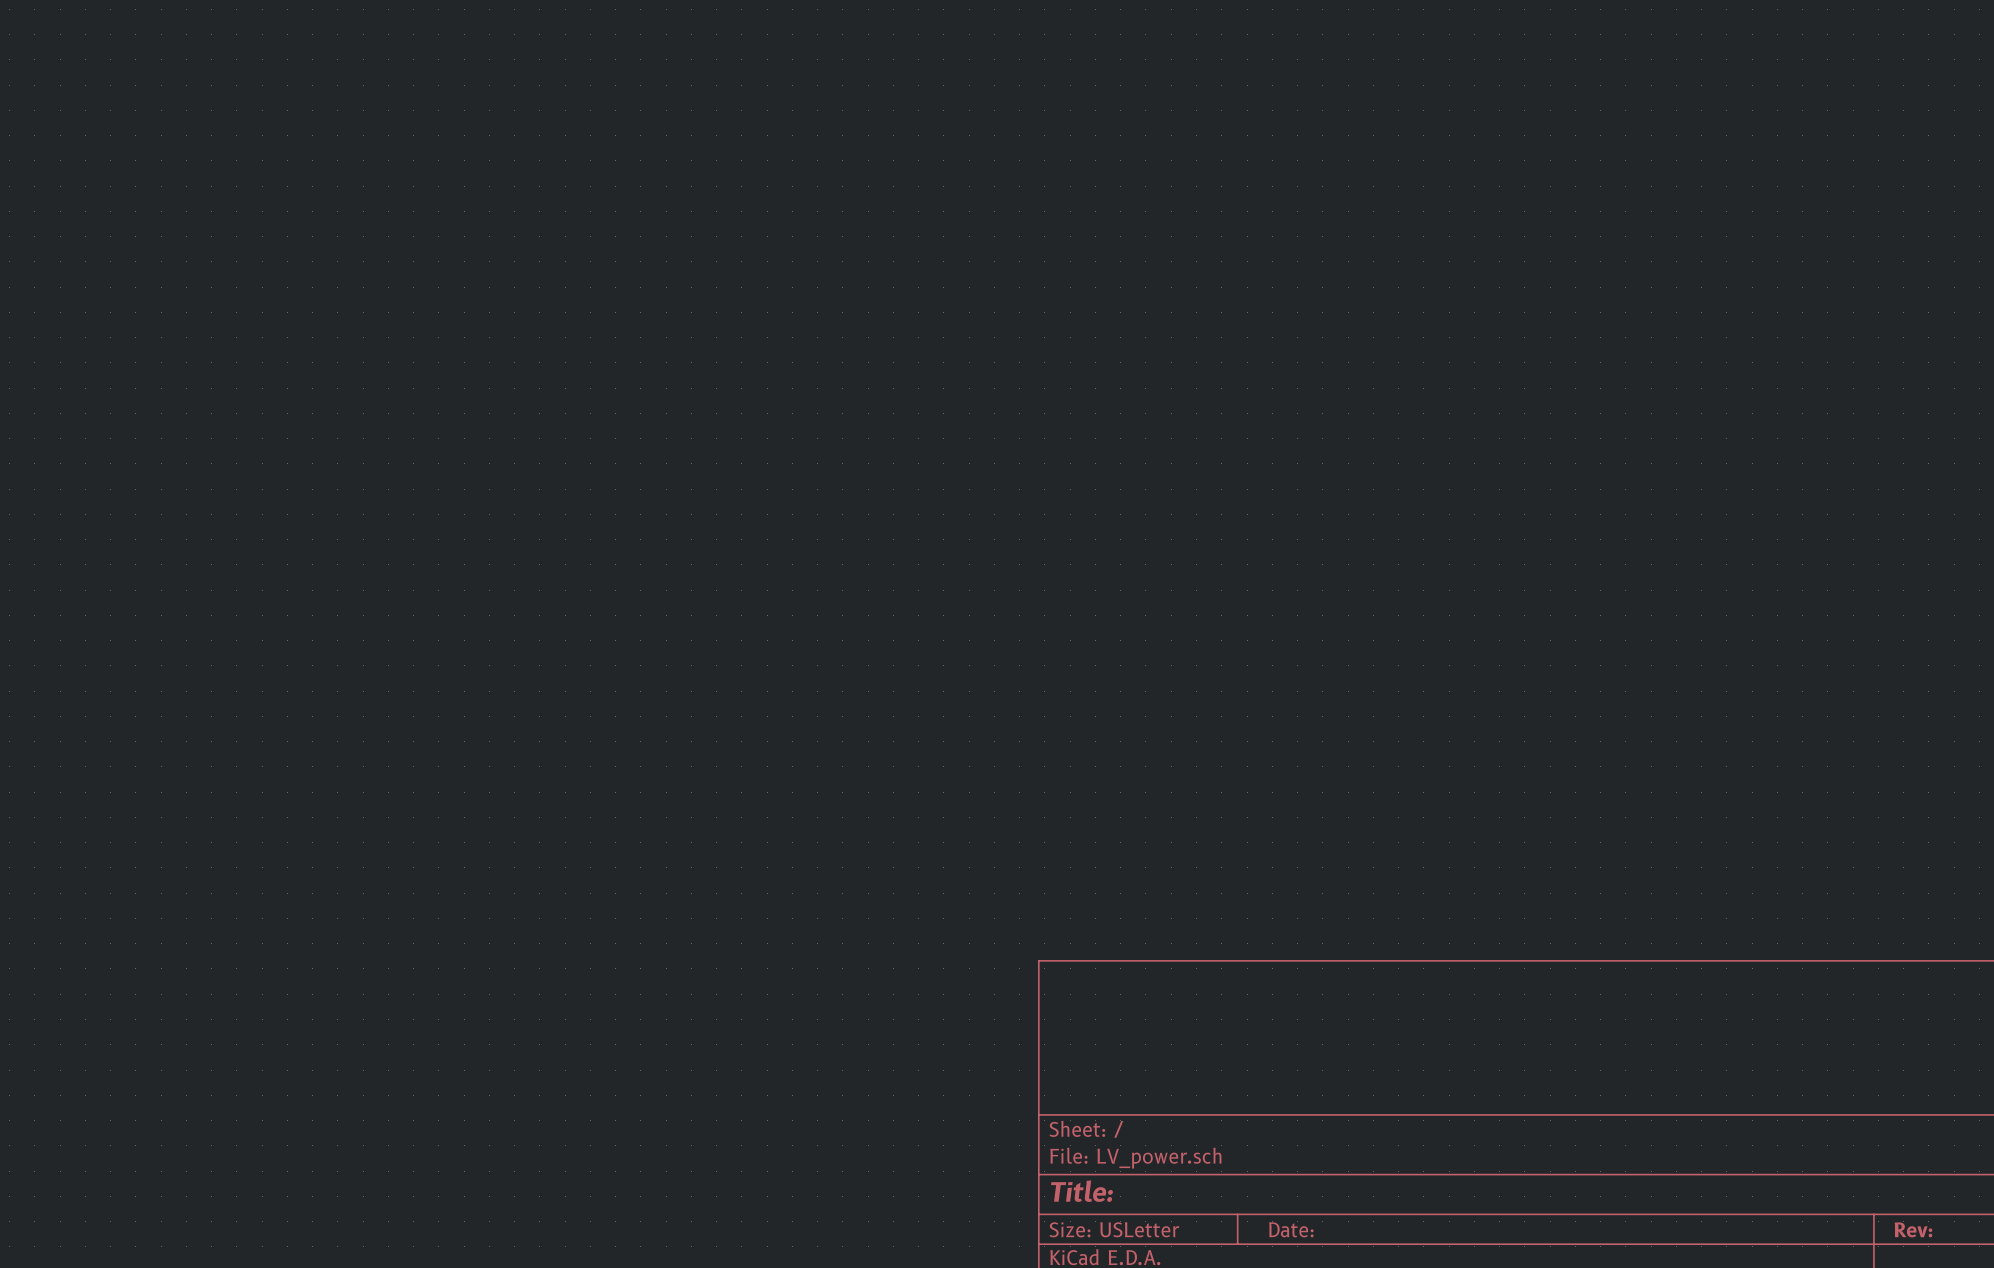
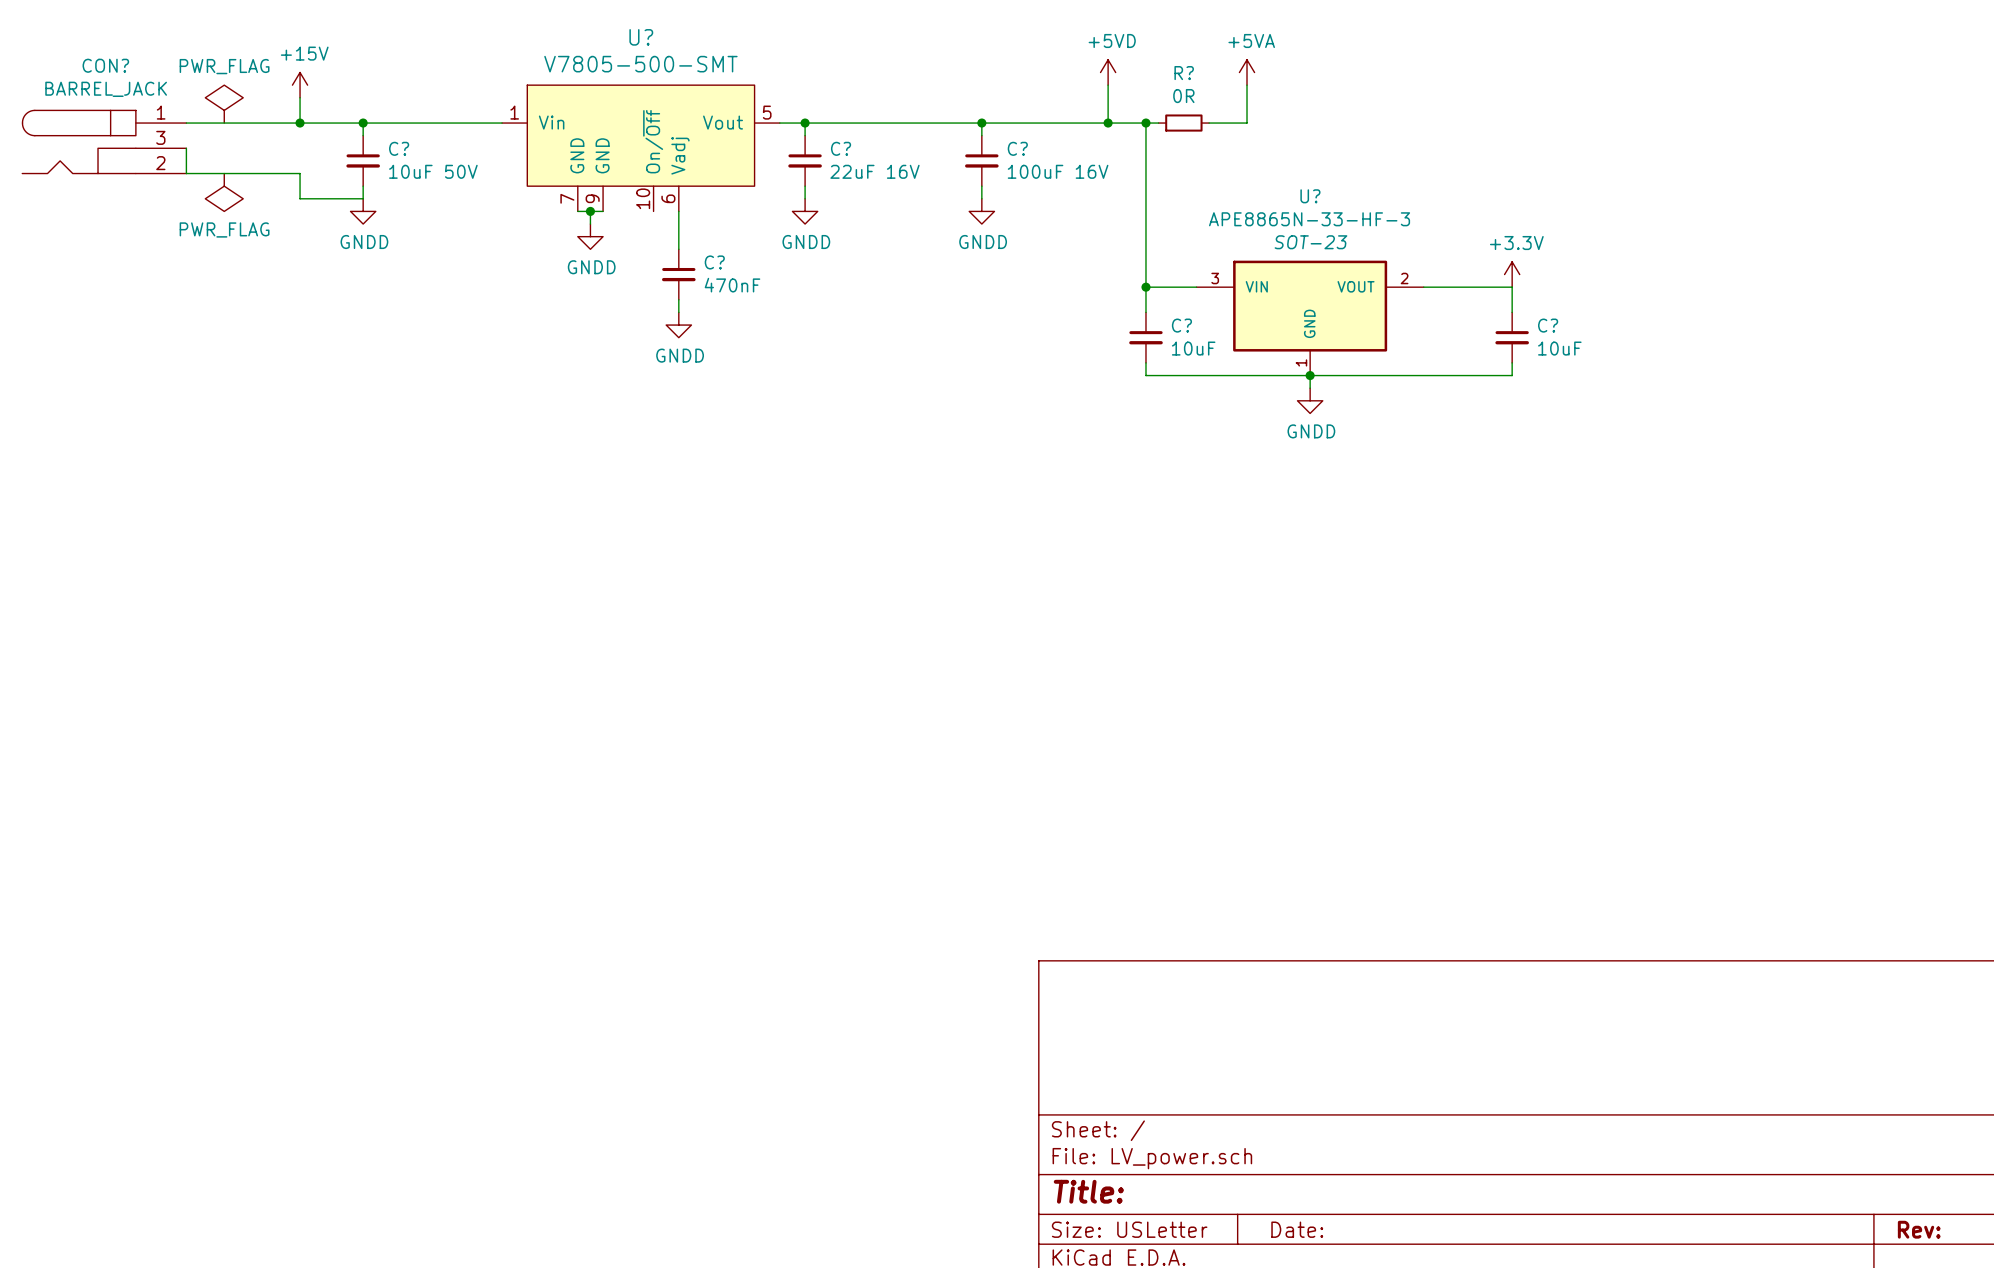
power symbol: none -> +5VD (1108, 72)
power symbol: none -> +5VA (1247, 72)
power symbol: none -> +15V (300, 85)
wire: none -> (1108, 85) (1108, 123)
wire: none -> (1247, 85) (1247, 123) (1209, 123)
wire: none -> (300, 97) (300, 123)
power symbol: none -> PWR_FLAG (224, 104)
wire: none -> (186, 123) (502, 123)
junction: none -> (300, 123)
wire: none -> (363, 123) (363, 135)
junction: none -> (363, 123)
wire: none -> (779, 123) (1158, 123)
wire: none -> (805, 123) (805, 135)
junction: none -> (805, 123)
wire: none -> (981, 123) (981, 135)
junction: none -> (981, 123)
junction: none -> (1108, 123)
wire: none -> (1145, 123) (1145, 312)
junction: none -> (1145, 123)
R?: none -> 0R (1183, 123)
CON?: none -> BARREL_JACK (104, 141)
wire: none -> (186, 148) (186, 173) (300, 173) (300, 198) (363, 198) (363, 186)
U?: none -> V7805-500-SMT (640, 148)
C?: none -> 10uF 50V (363, 160)
C?: none -> 22uF 16V (805, 160)
C?: none -> 100uF 16V (981, 160)
wire: none -> (805, 186) (805, 198)
wire: none -> (981, 186) (981, 198)
power symbol: none -> PWR_FLAG (224, 192)
power symbol: none -> GNDD (363, 211)
wire: none -> (577, 211) (603, 211)
wire: none -> (590, 211) (590, 224)
junction: none -> (590, 211)
wire: none -> (678, 211) (678, 249)
power symbol: none -> GNDD (805, 211)
power symbol: none -> GNDD (981, 211)
power symbol: none -> GNDD (590, 236)
C?: none -> 470nF (678, 274)
power symbol: none -> +3.3V (1512, 274)
wire: none -> (1145, 287) (1196, 287)
junction: none -> (1145, 287)
wire: none -> (1423, 287) (1512, 287) (1512, 312)
wire: none -> (678, 299) (678, 312)
U?: none -> APE8865N-33-HF-3 (1310, 318)
power symbol: none -> GNDD (678, 325)
C?: none -> 10uF (1145, 337)
C?: none -> 10uF (1512, 337)
wire: none -> (1145, 362) (1145, 375) (1512, 375) (1512, 362)
wire: none -> (1310, 375) (1310, 388)
junction: none -> (1310, 375)
power symbol: none -> GNDD (1310, 400)

